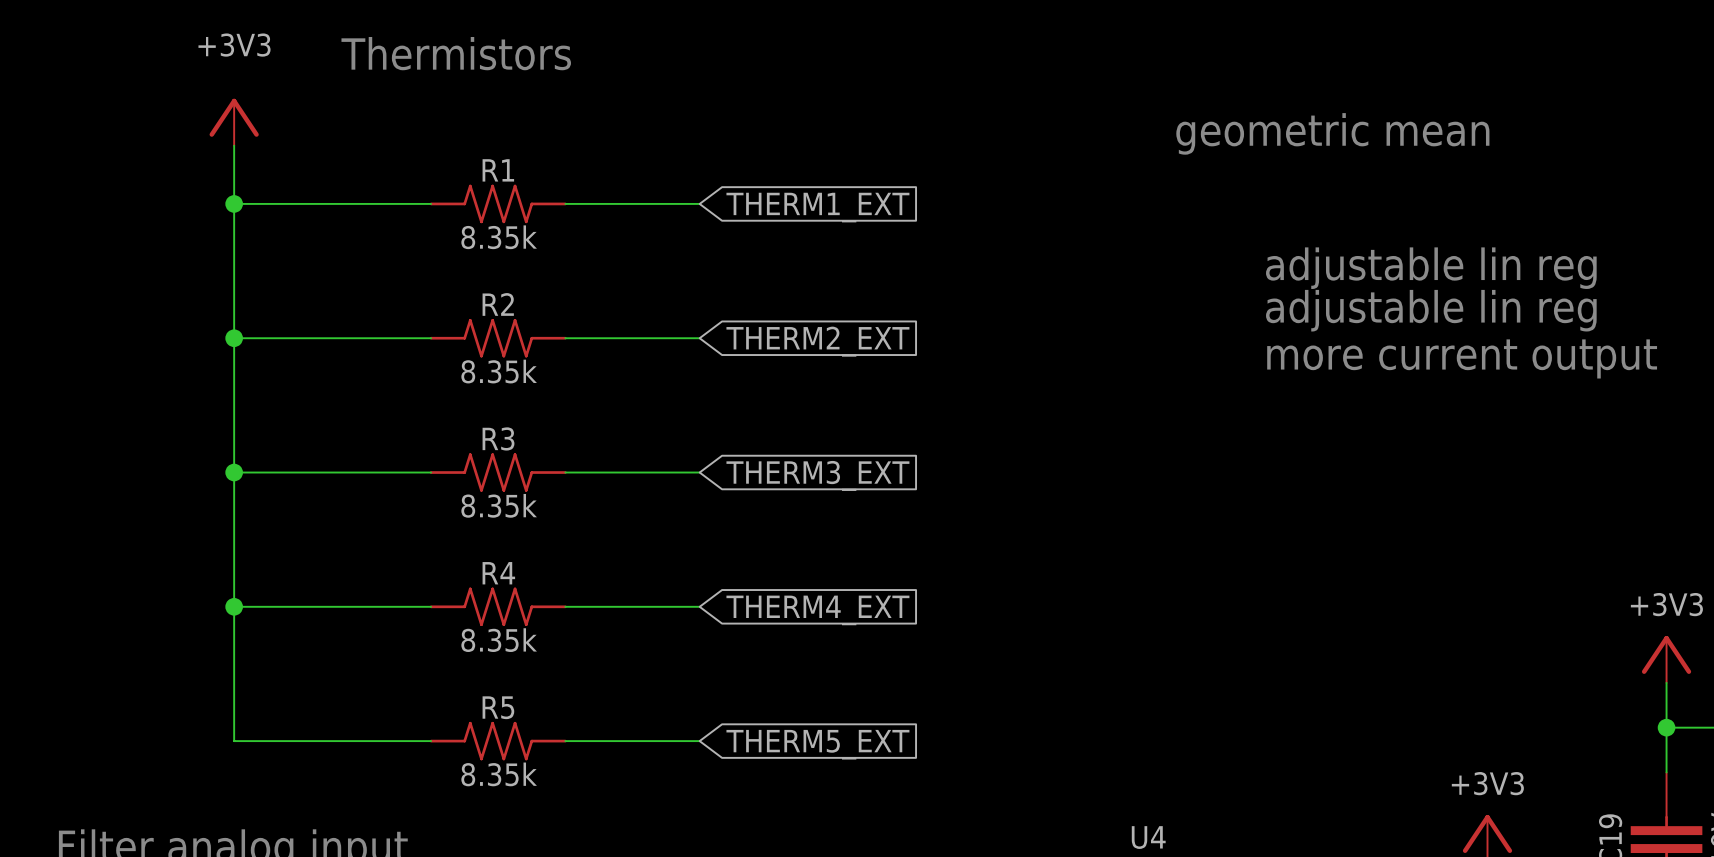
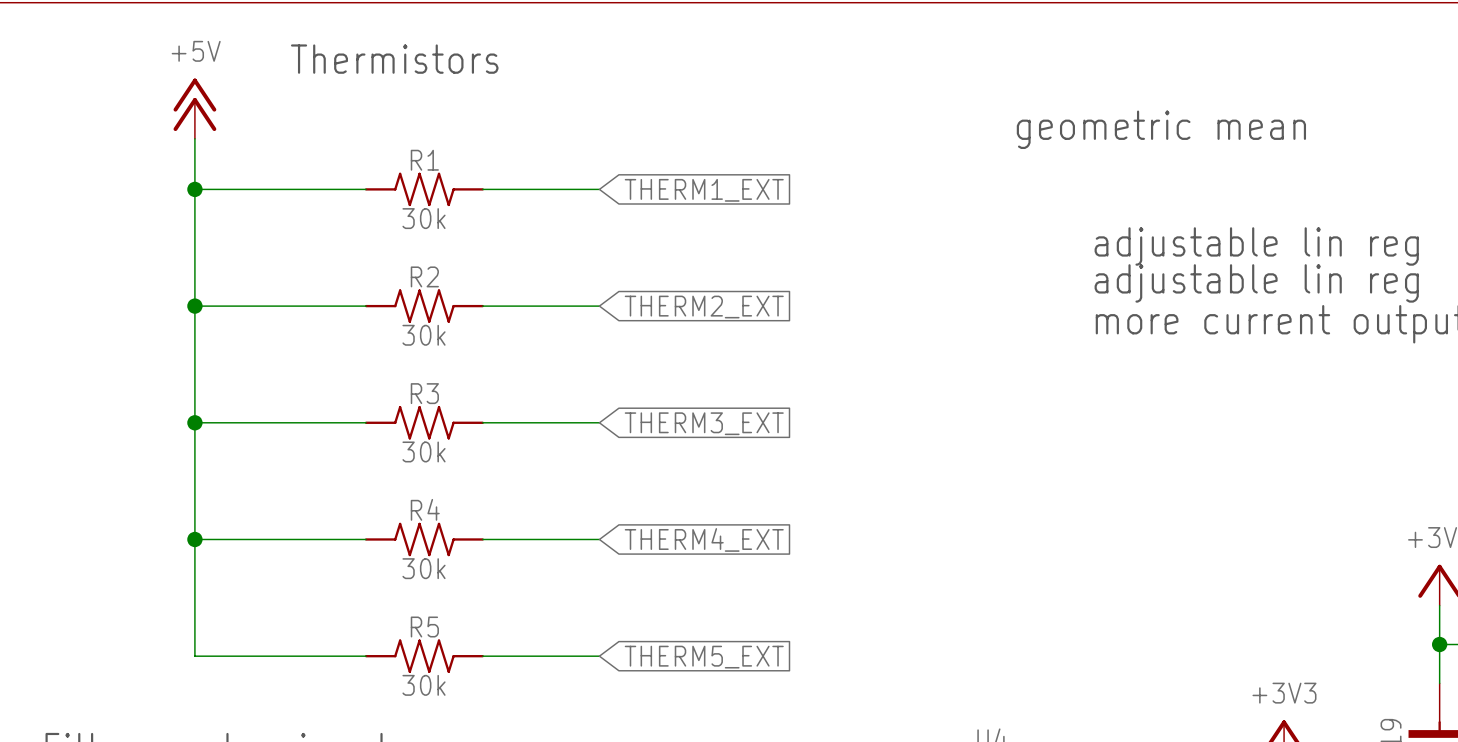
power symbol: +3V3 (234, 122) -> +5V (194, 108)
R1 text: 8.35k (499, 237) -> 30k (424, 218)
R2 text: 8.35k (499, 371) -> 30k (424, 335)
R3 text: 8.35k (499, 505) -> 30k (424, 451)
R4 text: 8.35k (499, 640) -> 30k (424, 568)
R5 text: 8.35k (499, 774) -> 30k (424, 685)

